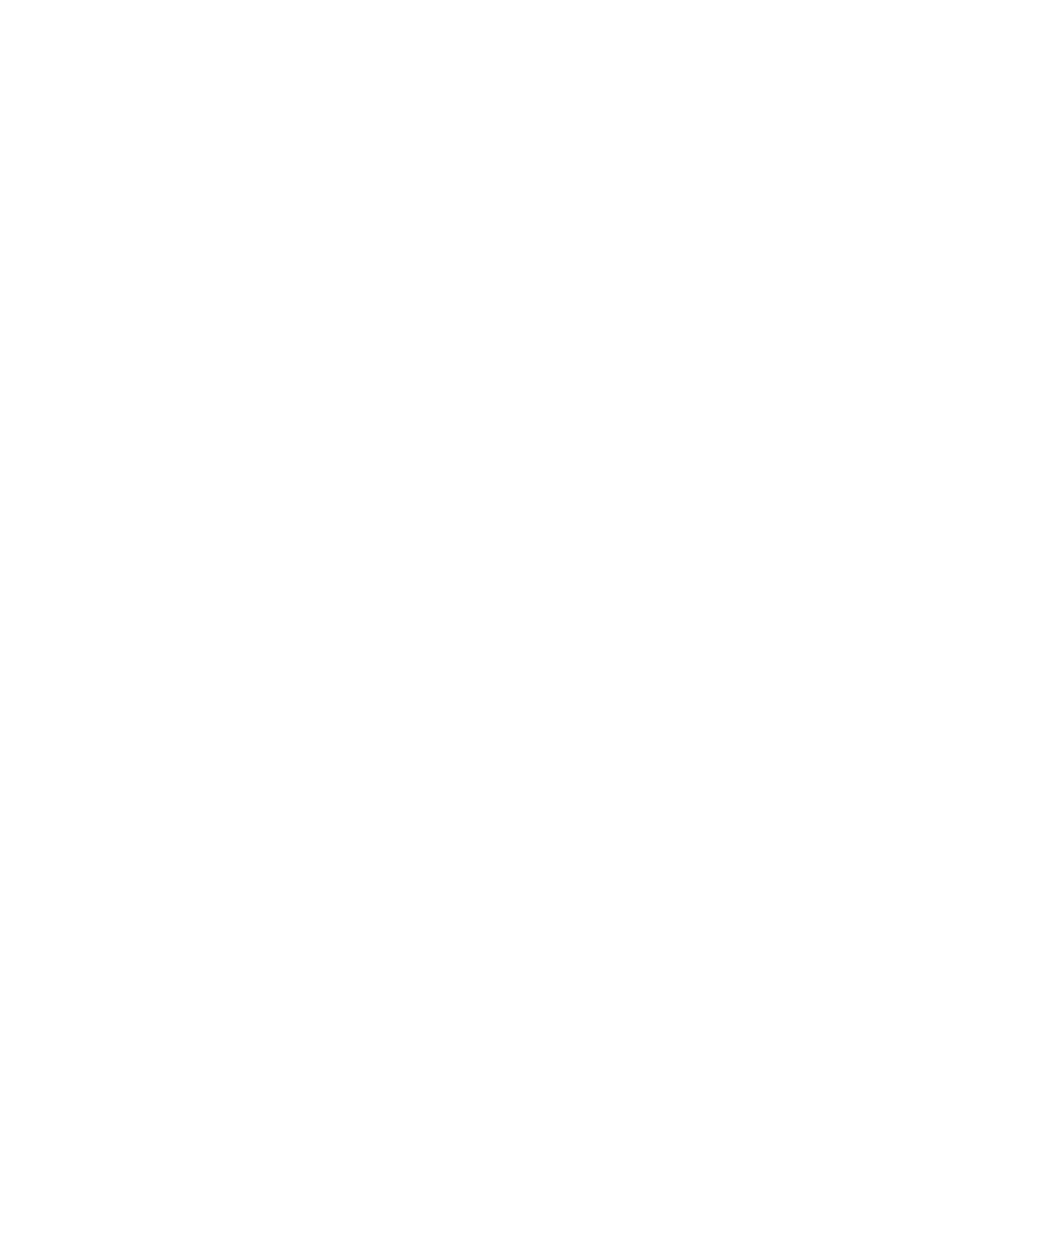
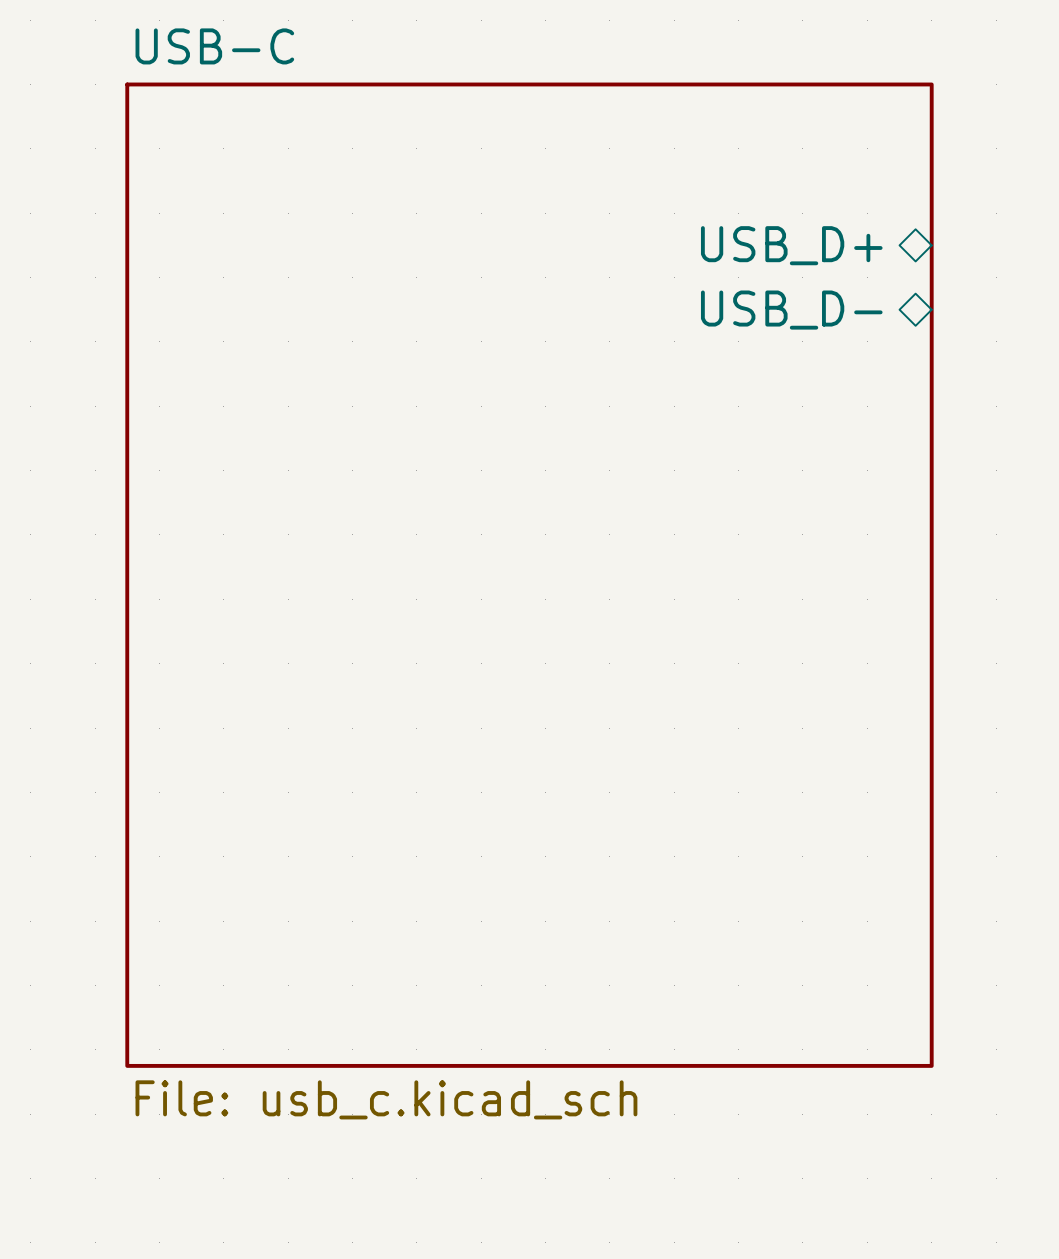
sheet pin: none -> USB_D+ (791, 245)
sheet pin: none -> USB_D- (791, 310)
sheet USB-C: none -> File: usb_c.kicad_sch (529, 575)

